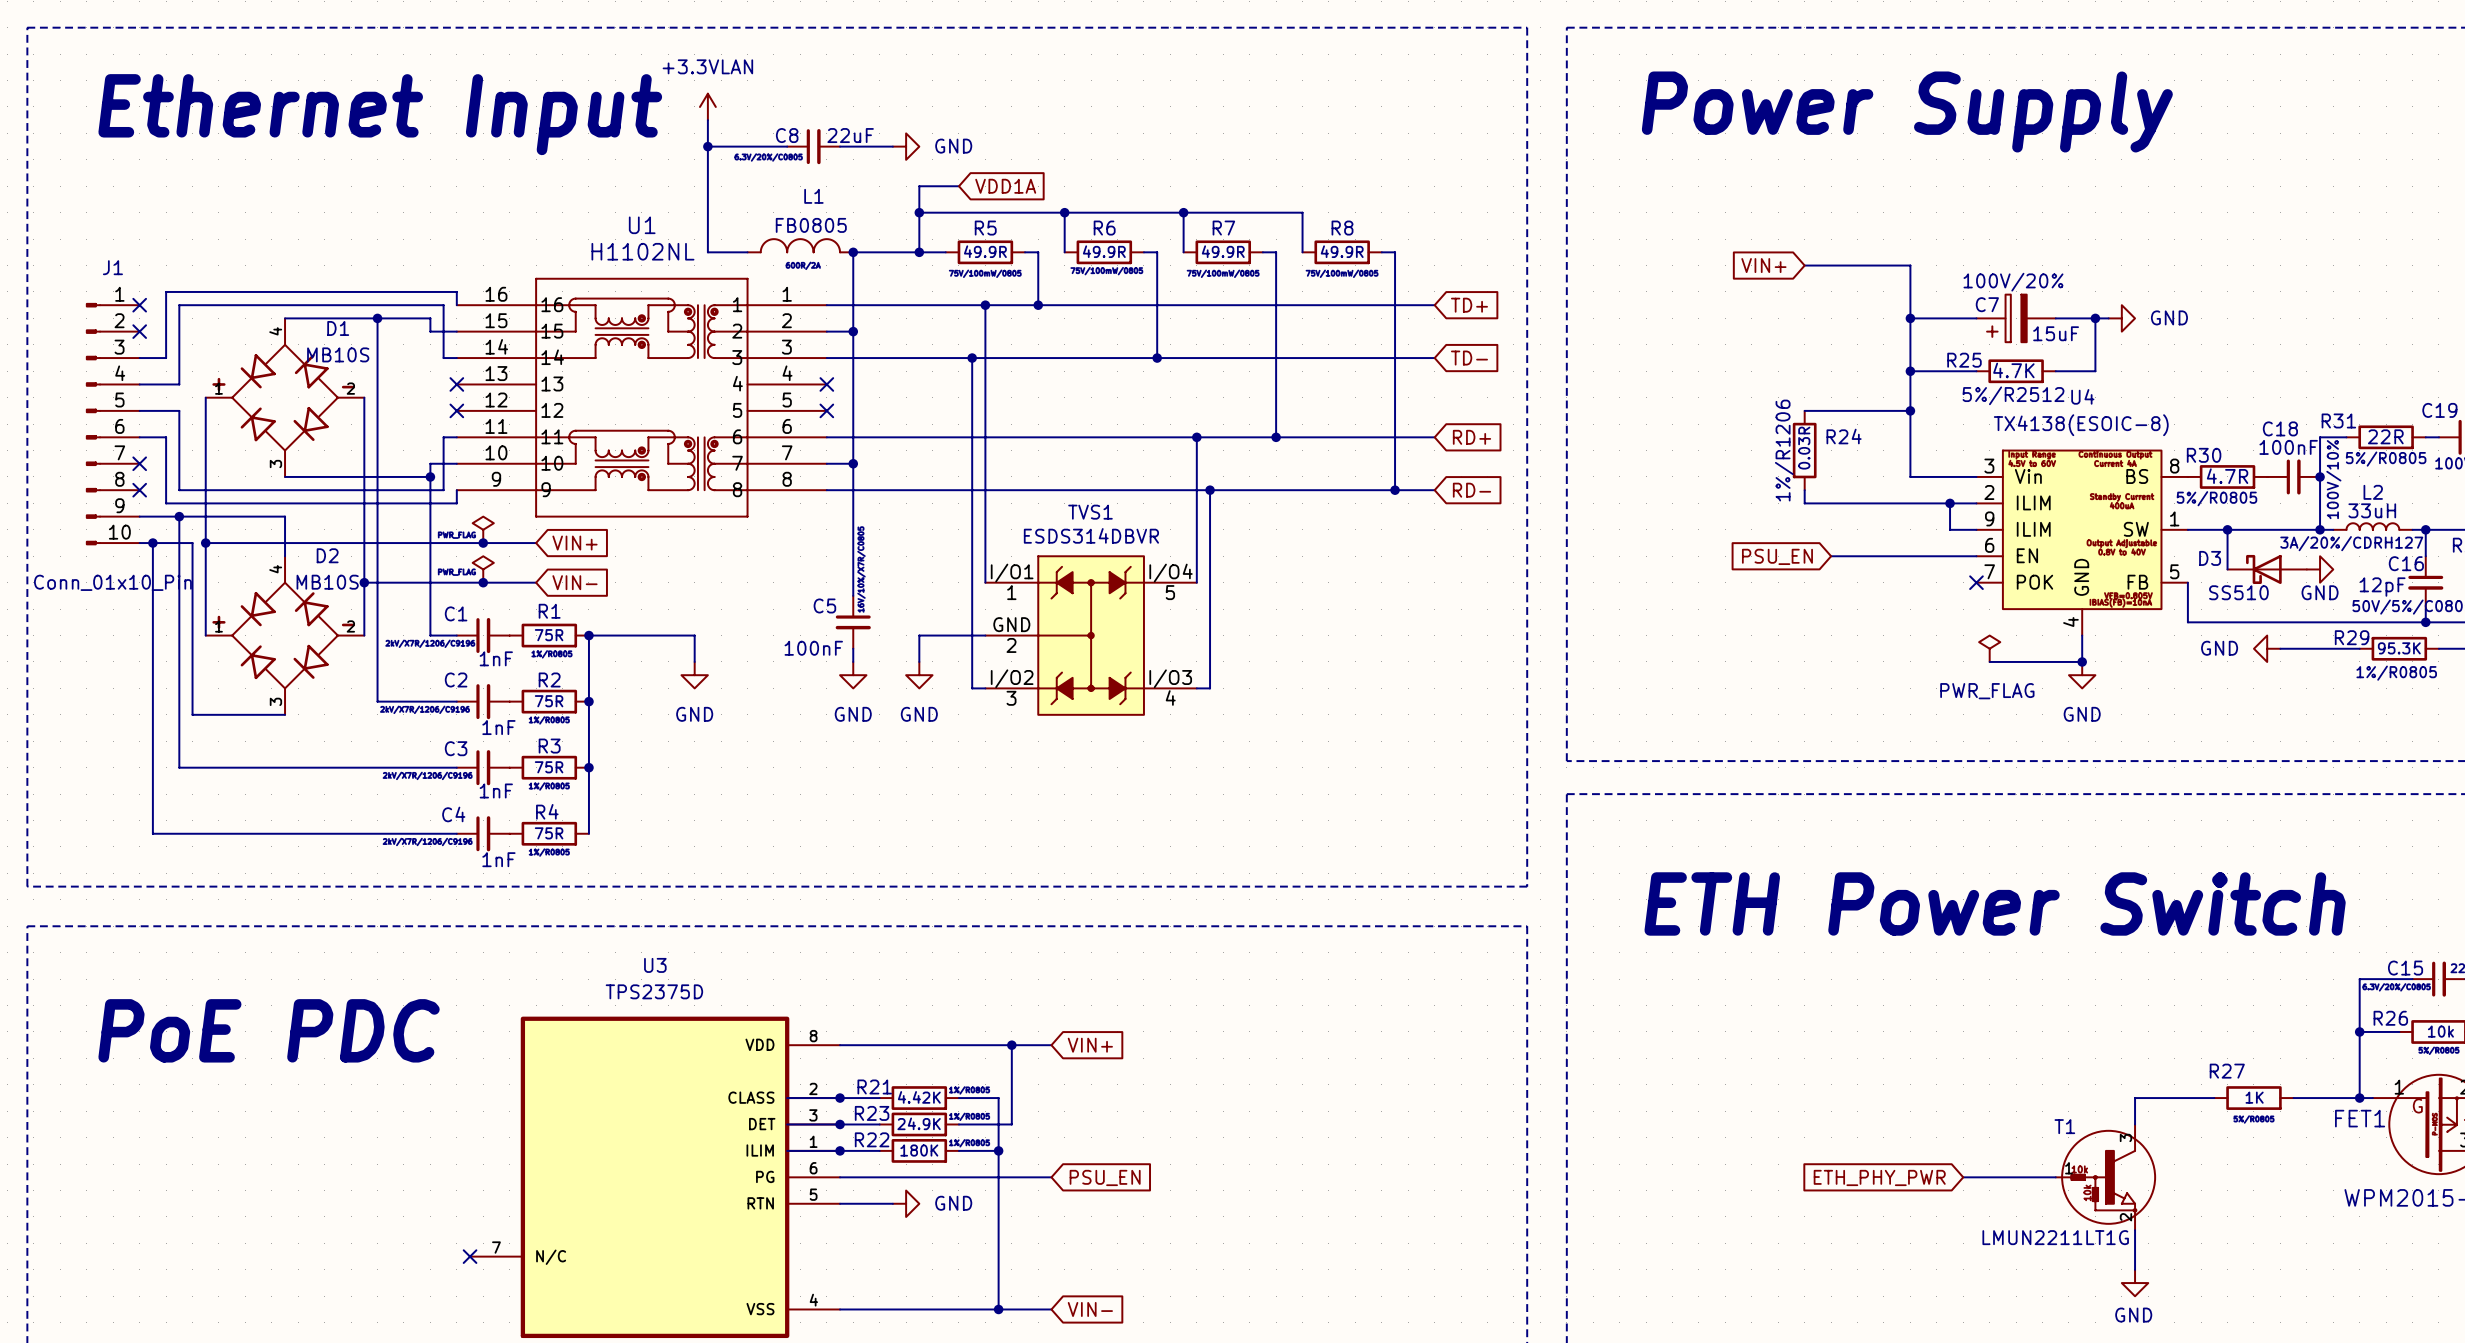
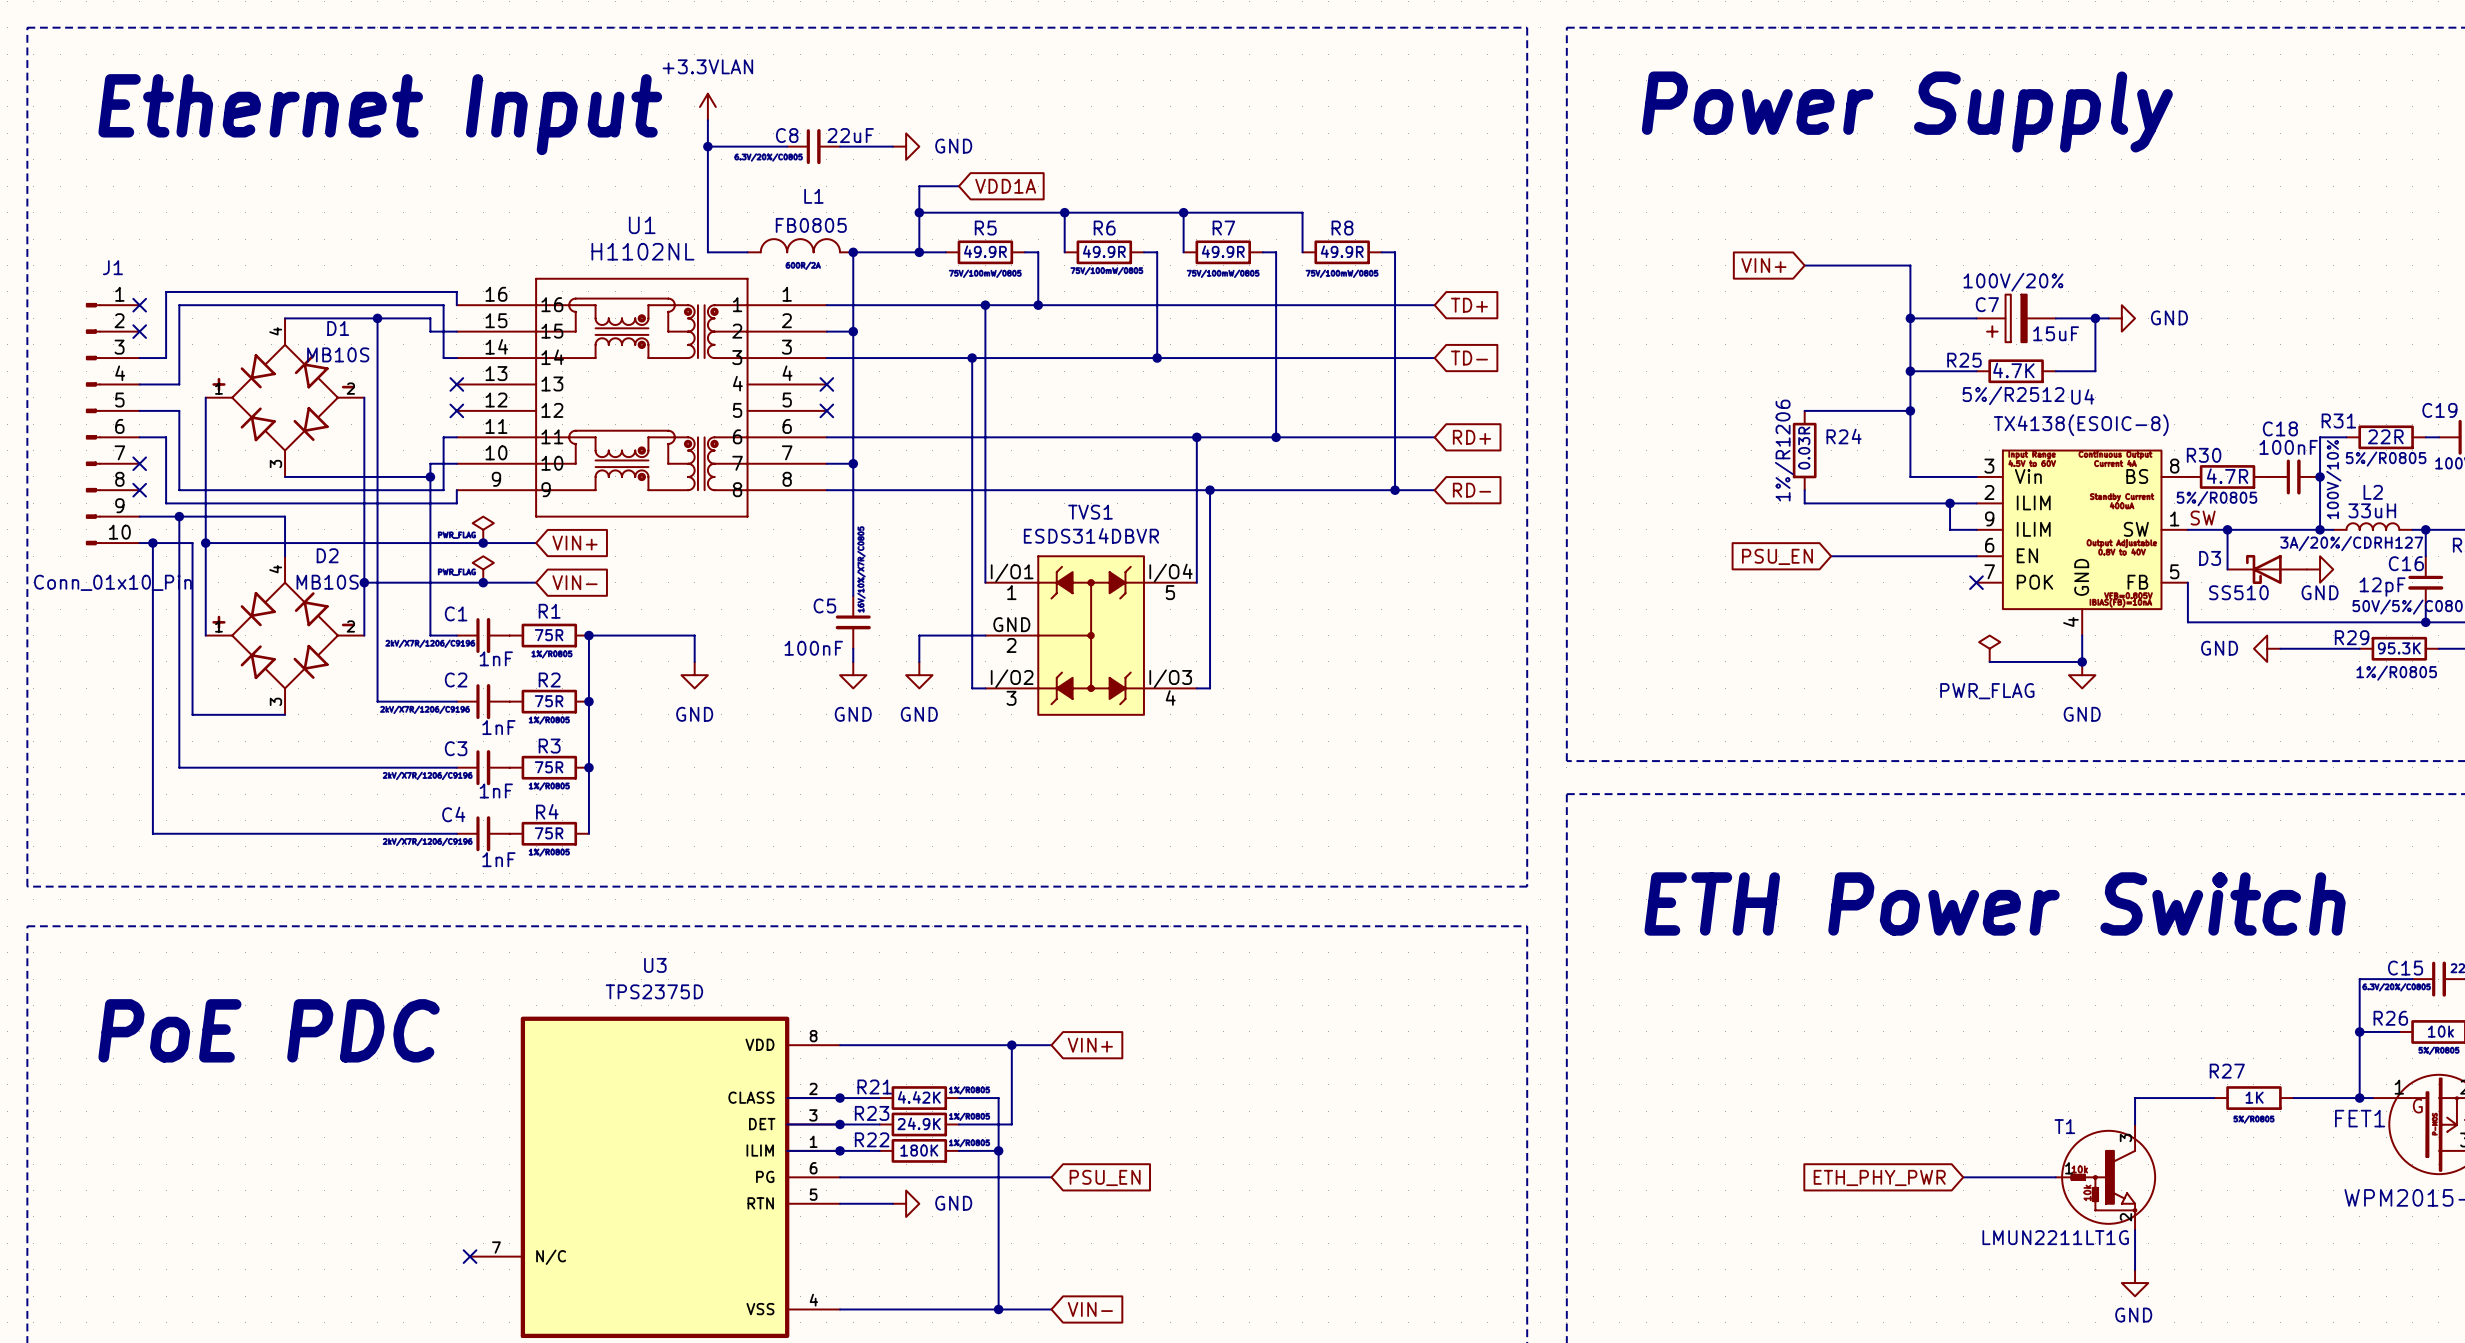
label: none -> SW (2203, 518)

